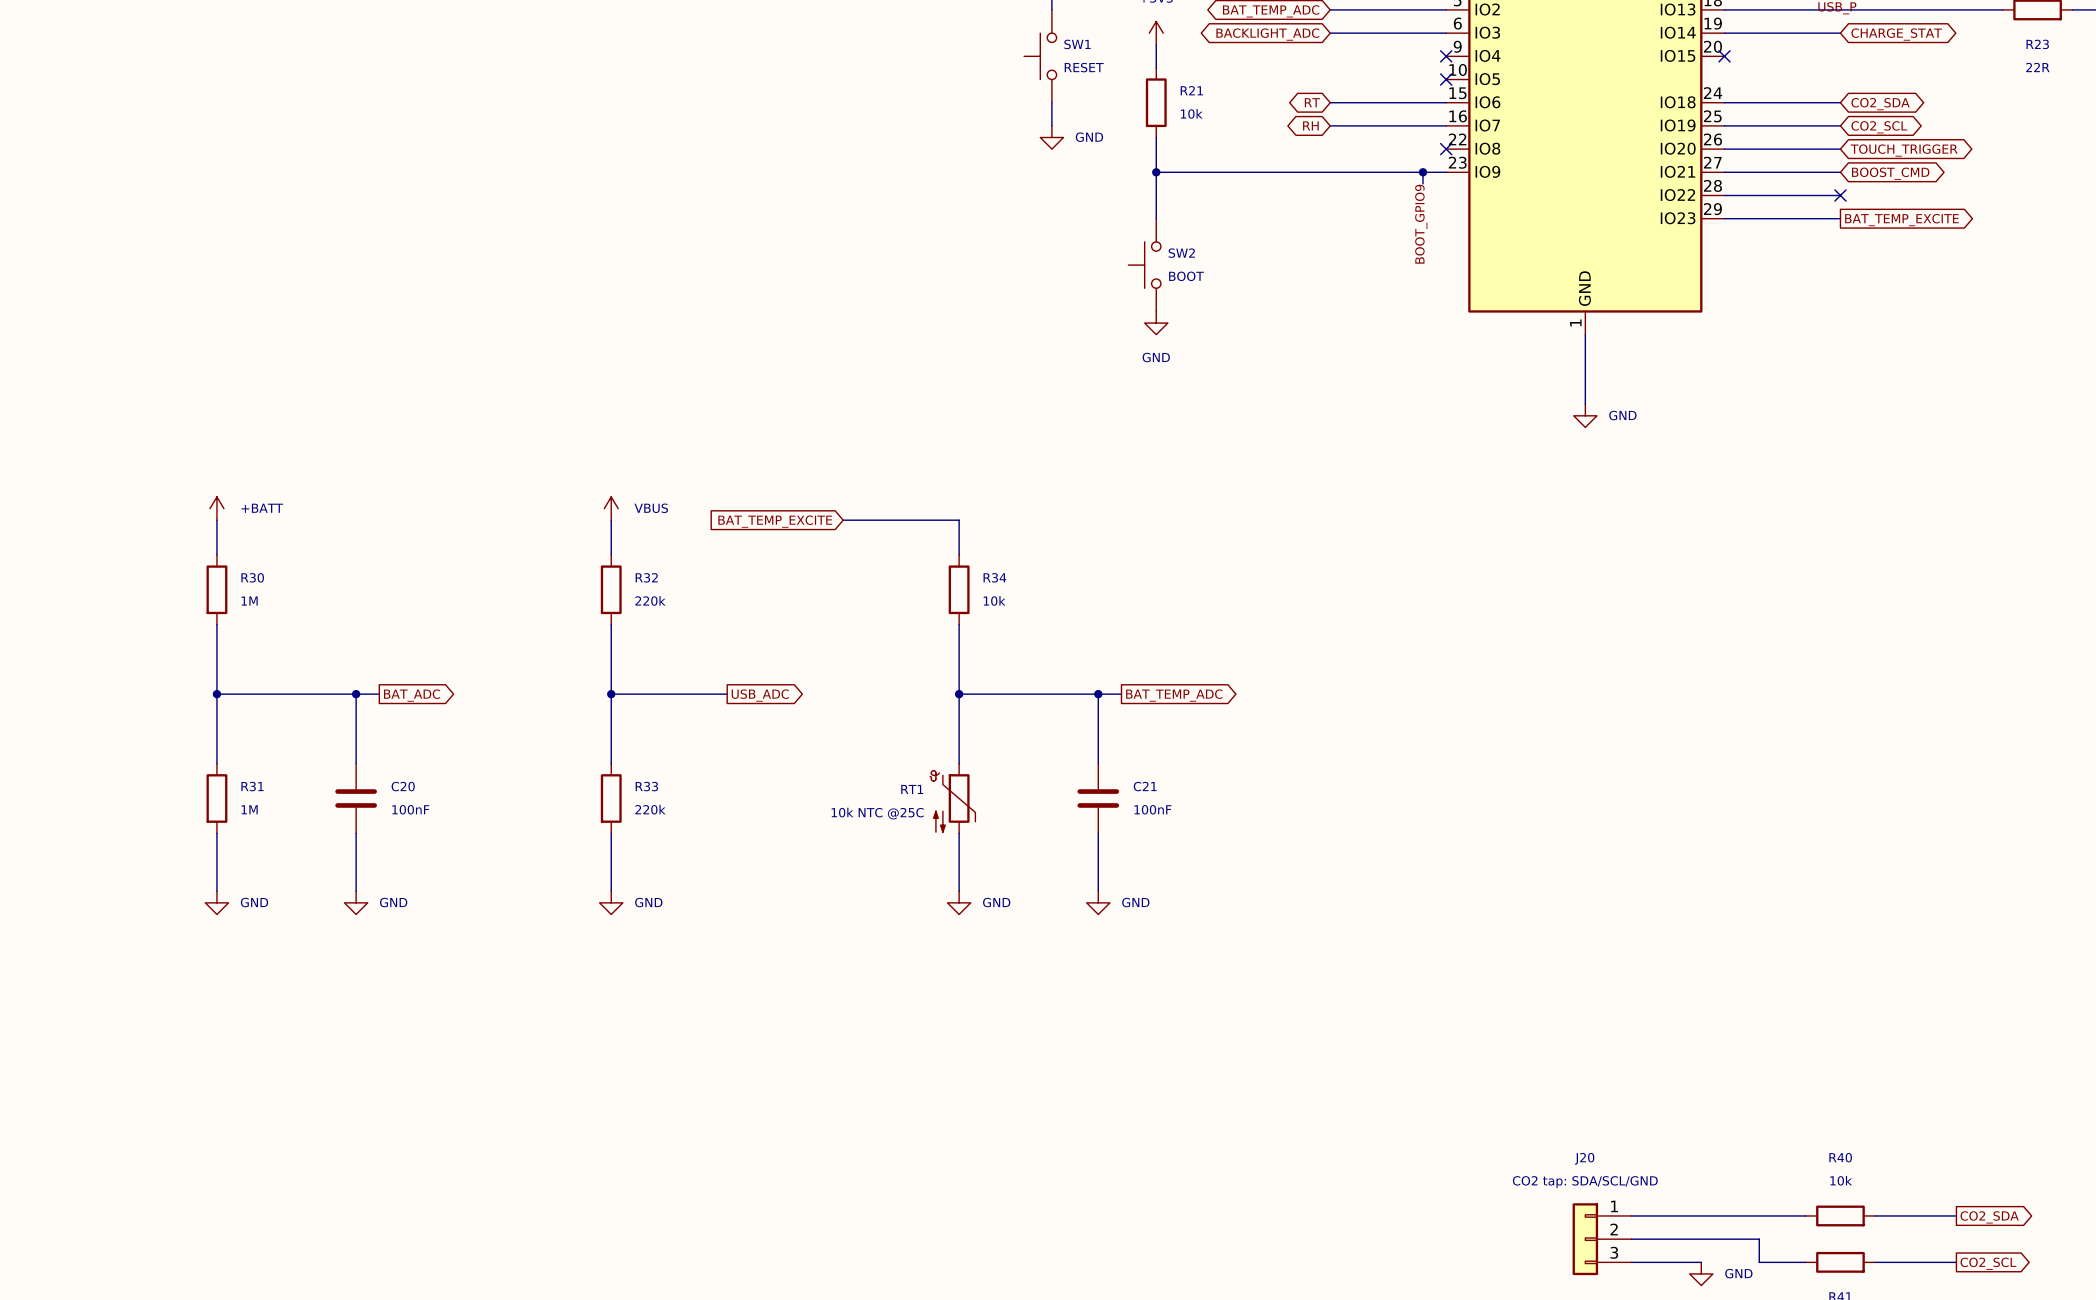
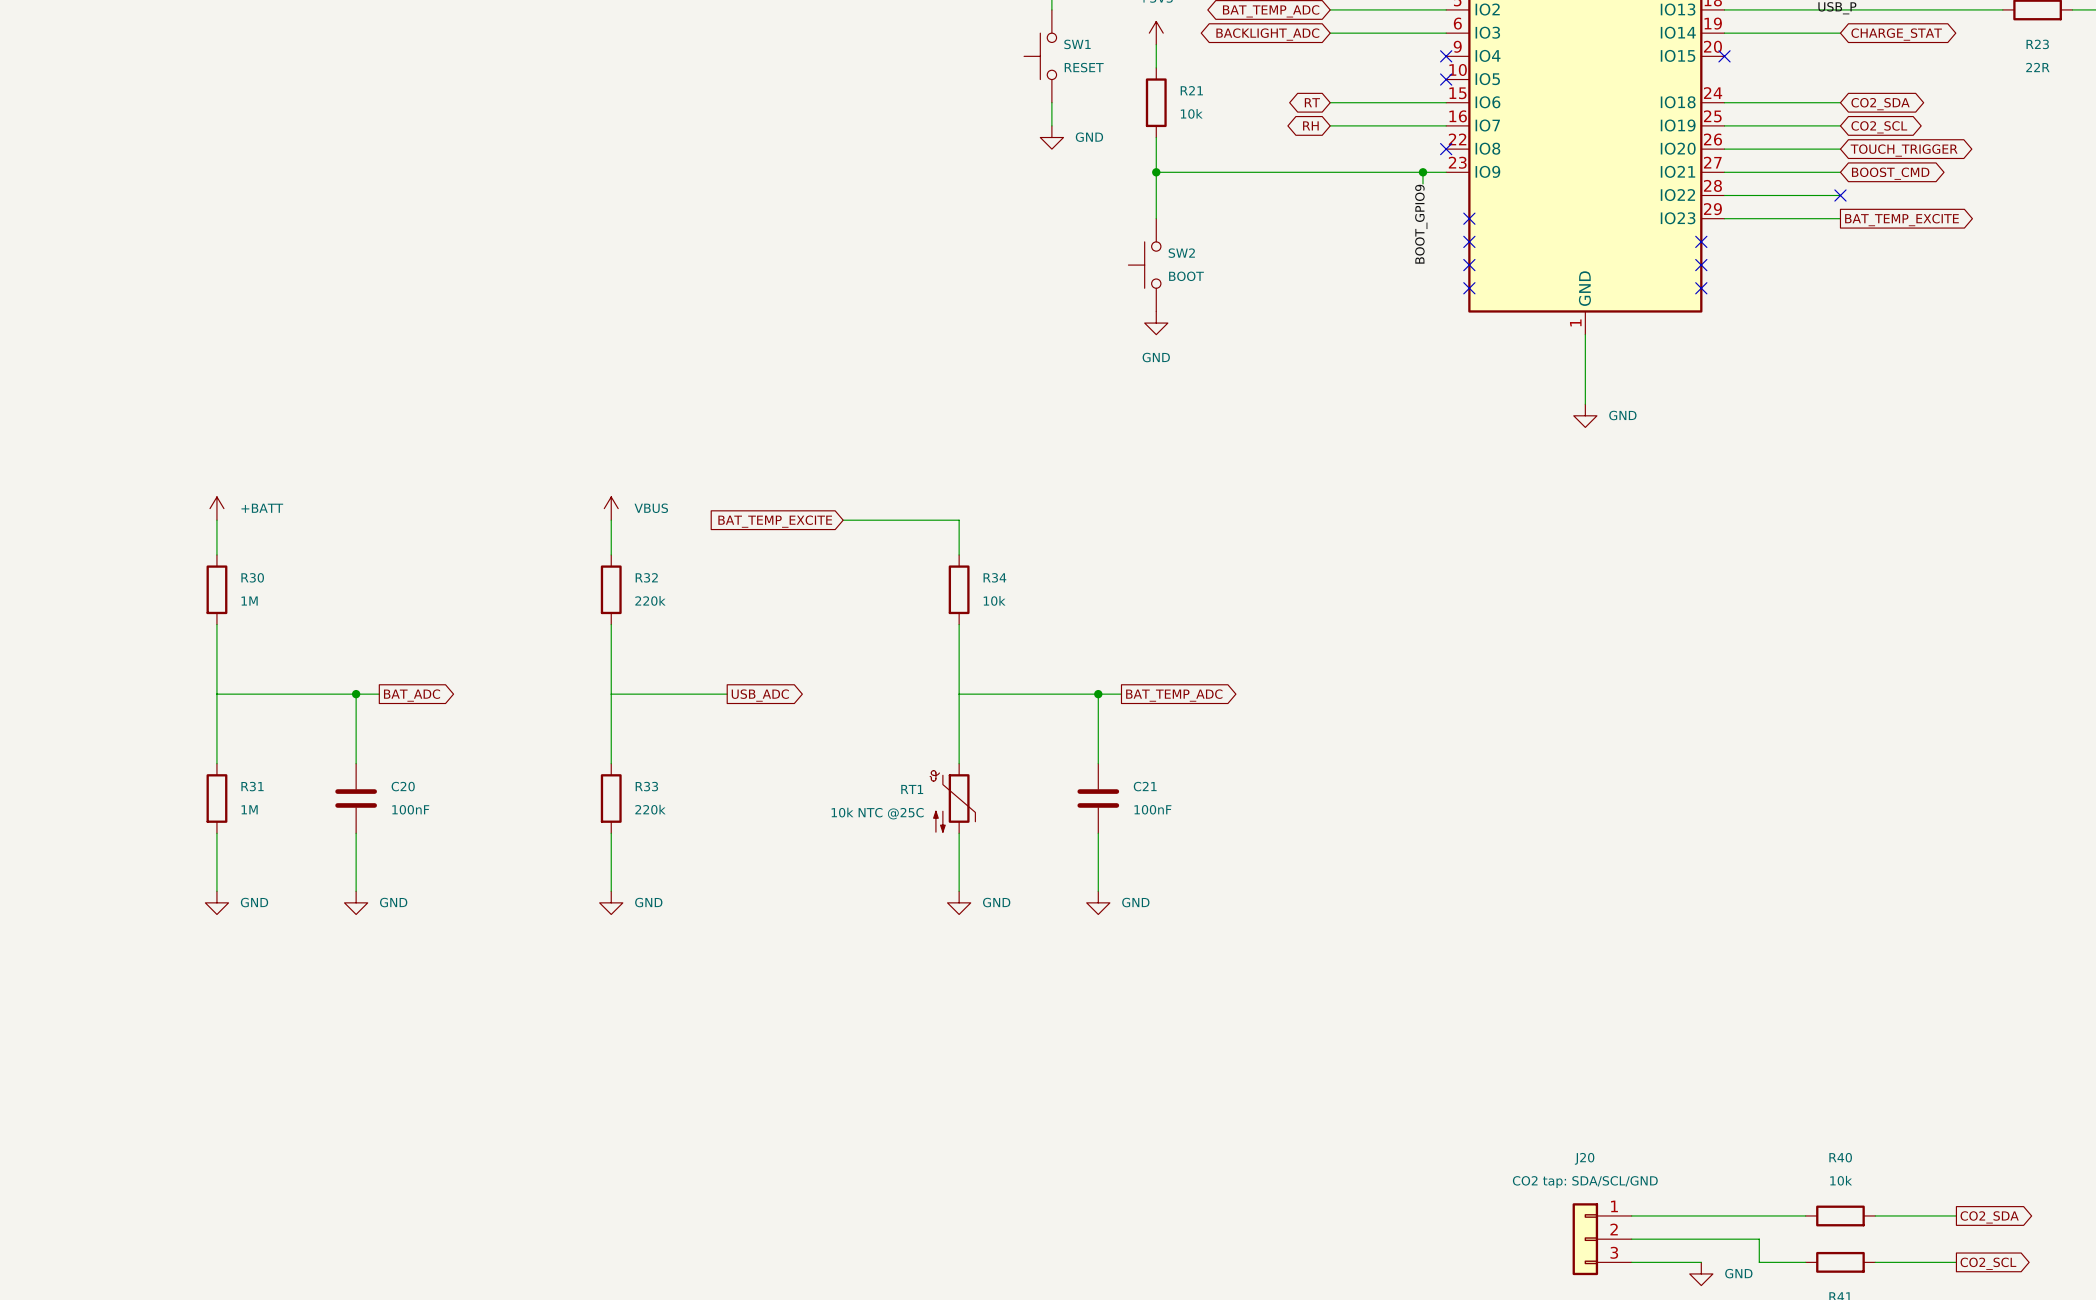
no-connect mark: none -> (1469, 218)
no-connect mark: none -> (1469, 241)
no-connect mark: none -> (1701, 241)
no-connect mark: none -> (1469, 265)
no-connect mark: none -> (1701, 265)
no-connect mark: none -> (1469, 288)
no-connect mark: none -> (1701, 288)
junction: (216, 694) -> none
junction: (611, 694) -> none
junction: (959, 694) -> none

